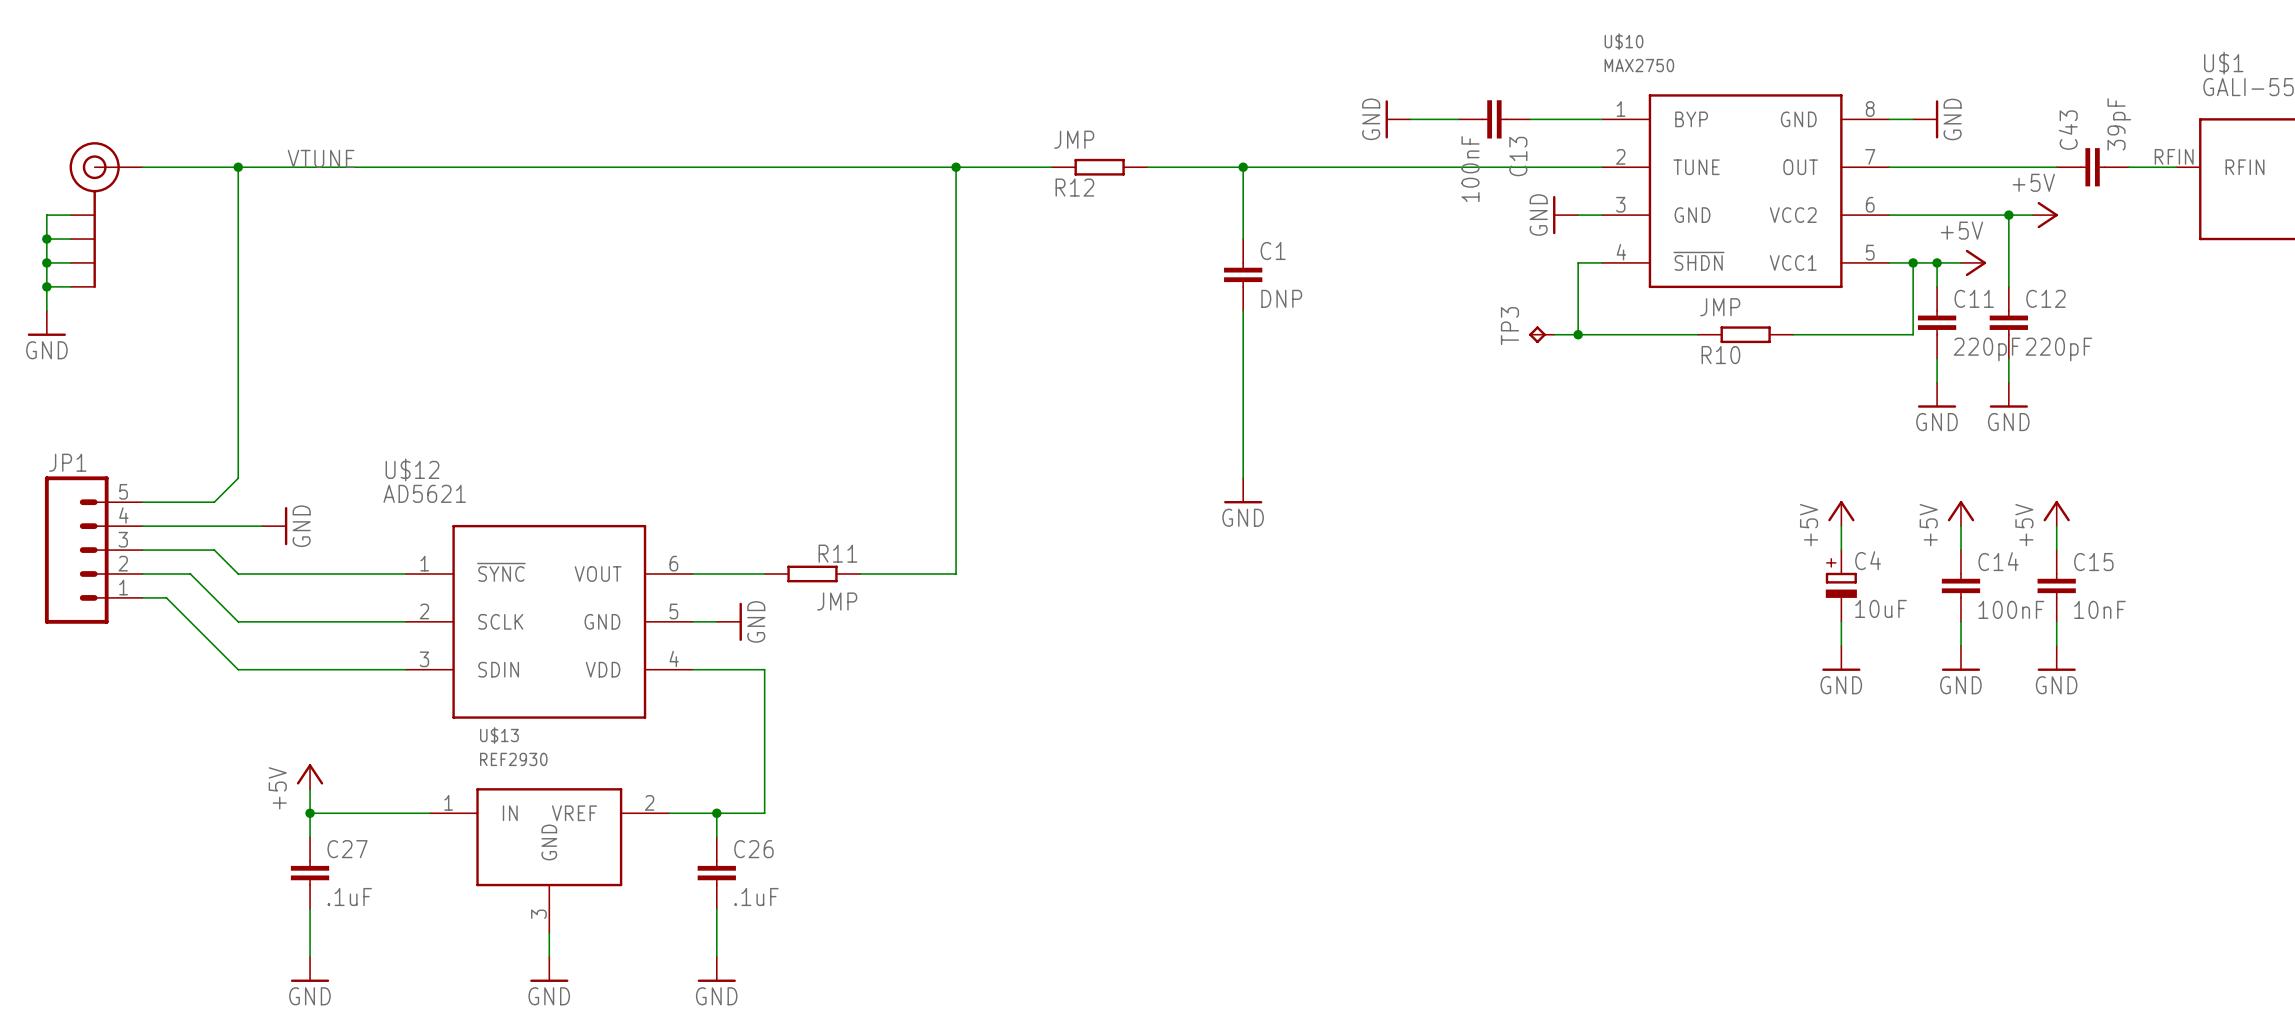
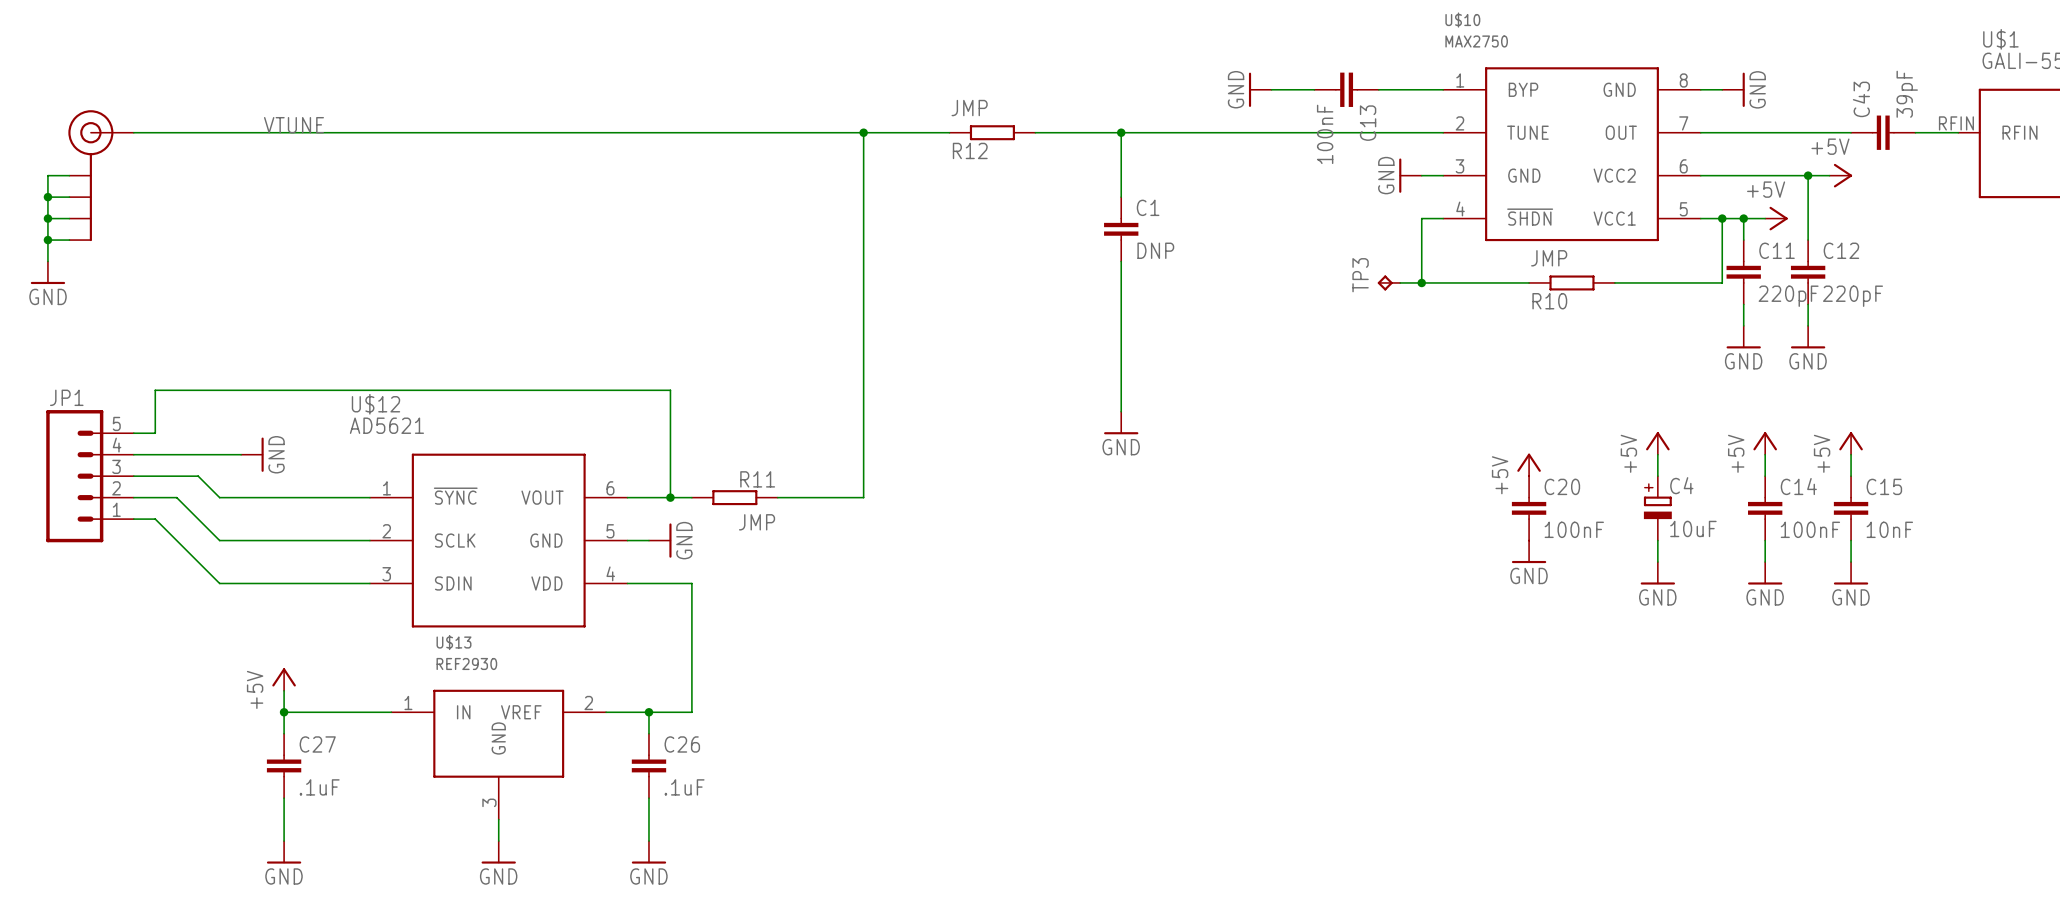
wire: (238, 167) (238, 478) (214, 502) (166, 502) -> (670, 497) (670, 390) (155, 390) (155, 433)
junction: (238, 167) -> none
power symbol: none -> +5V (1529, 464)
junction: none -> (670, 497)
C20: none -> 100nF (1529, 508)
power symbol: none -> GND (1529, 551)

